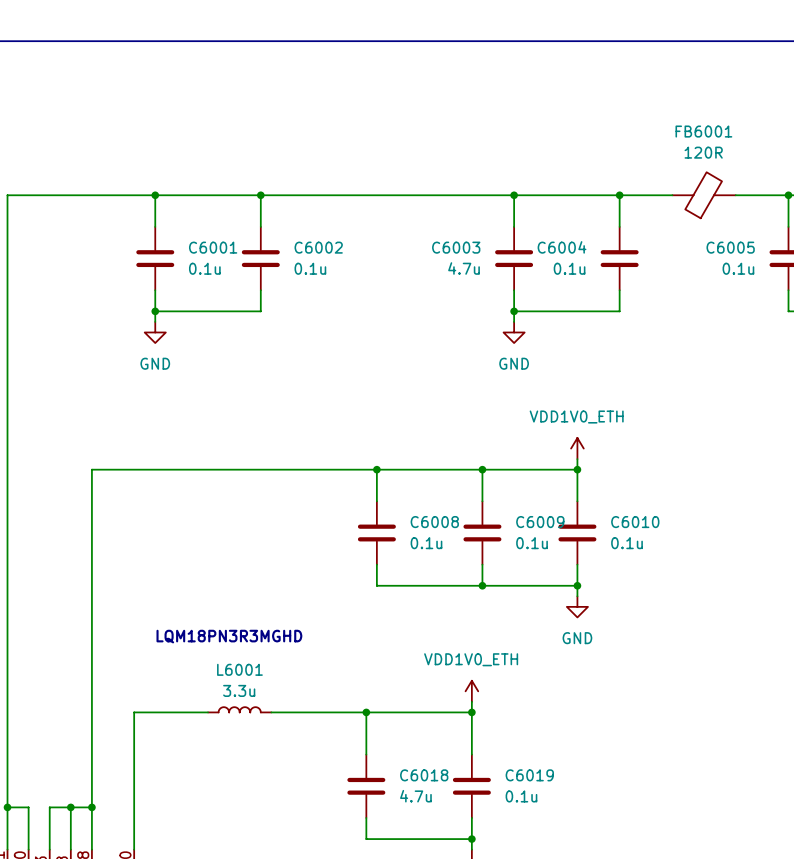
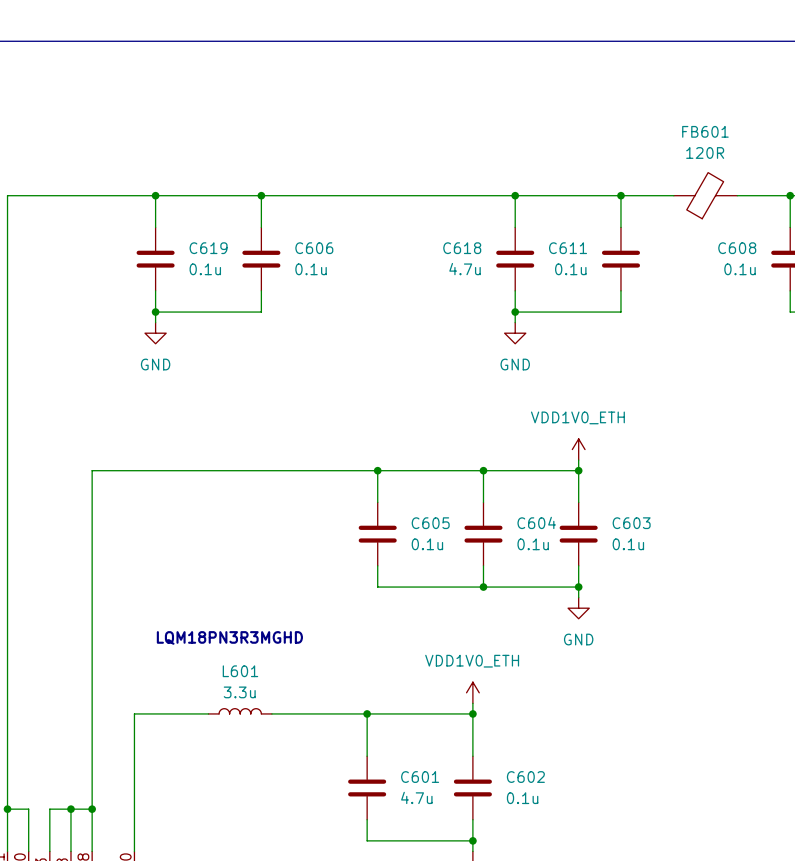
FB6001 name: FB6001 (703, 131) -> FB601 (705, 131)
C6001 name: C6001 (213, 247) -> C619 (208, 248)
C6002 name: C6002 (318, 247) -> C606 (314, 248)
C6003 name: C6003 (456, 247) -> C618 (462, 248)
C6004 name: C6004 (562, 247) -> C611 (568, 248)
C6005 name: C6005 (730, 247) -> C608 (737, 248)
C6008 name: C6008 (434, 522) -> C605 (430, 523)
C6009 name: C6009 (540, 522) -> C604 (536, 522)
C6010 name: C6010 (635, 522) -> C603 (631, 523)
L6001 name: L6001 (239, 669) -> L601 (240, 671)
C6018 name: C6018 (424, 775) -> C601 (420, 777)
C6019 name: C6019 (529, 775) -> C602 (525, 777)

